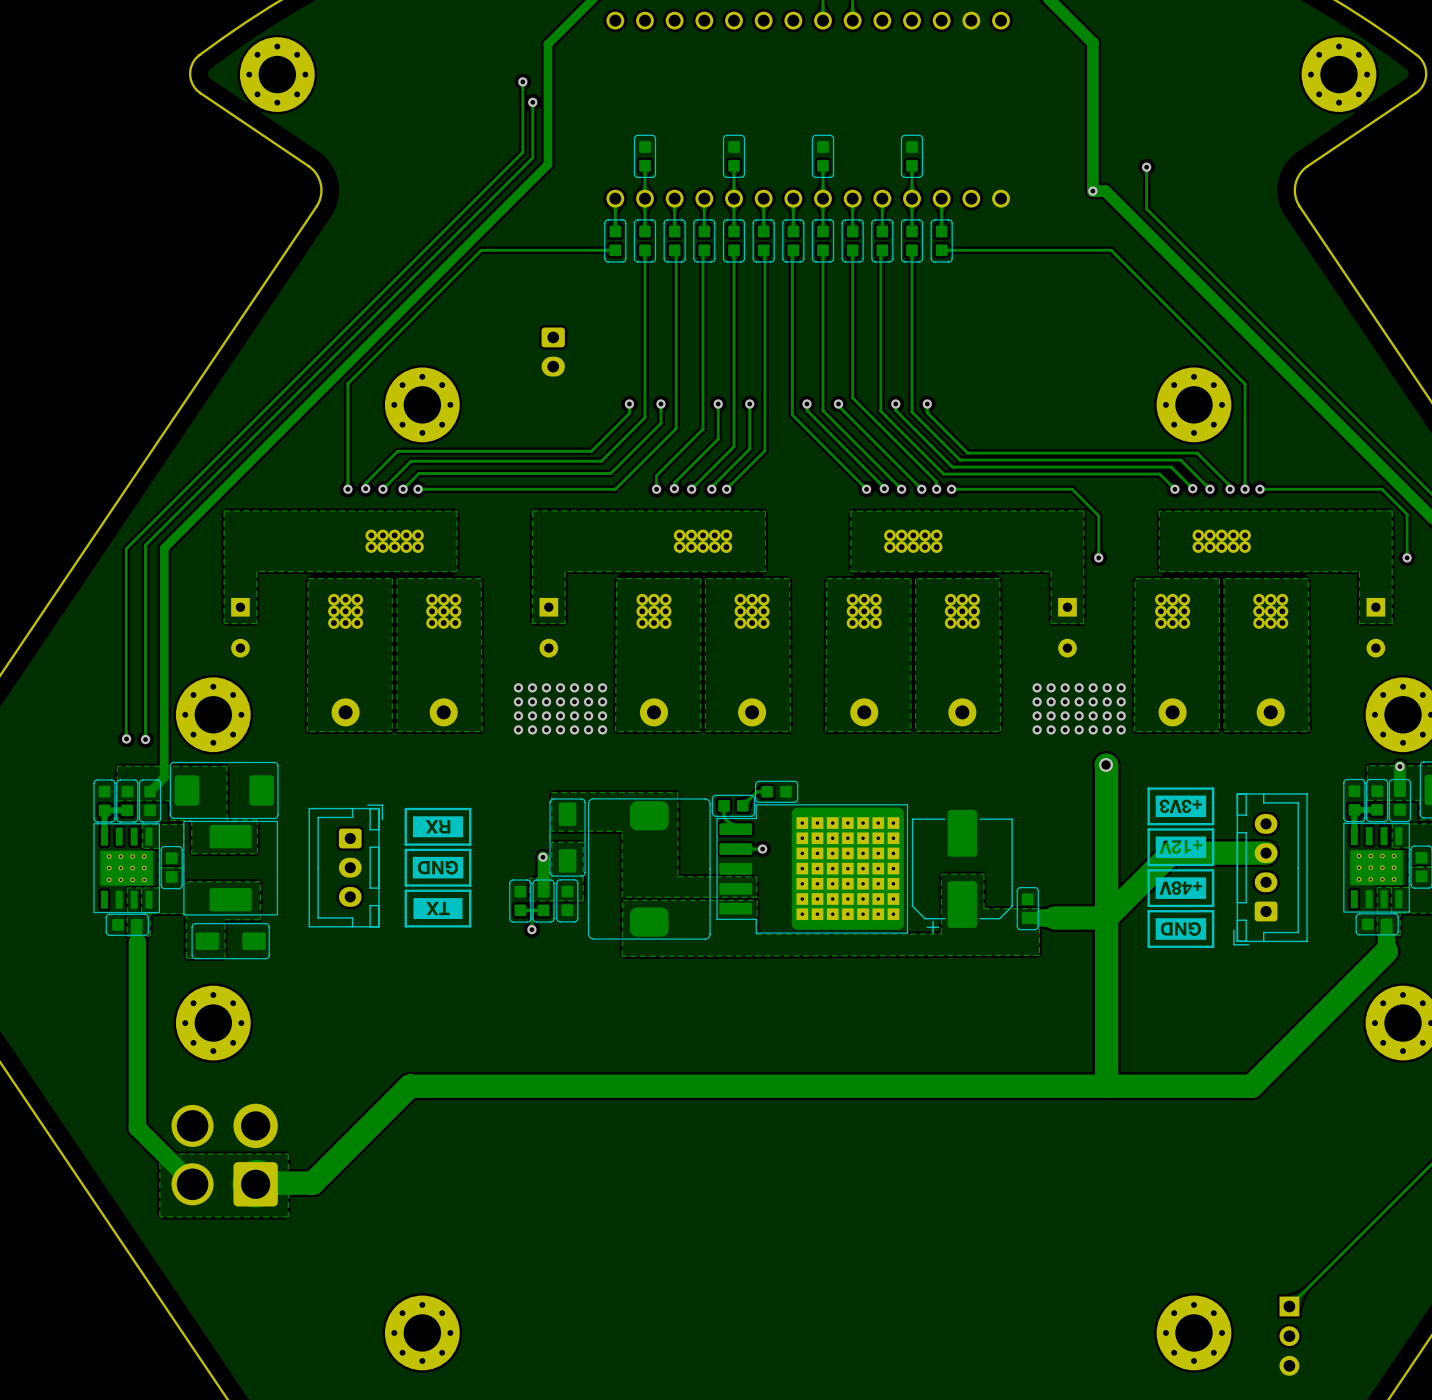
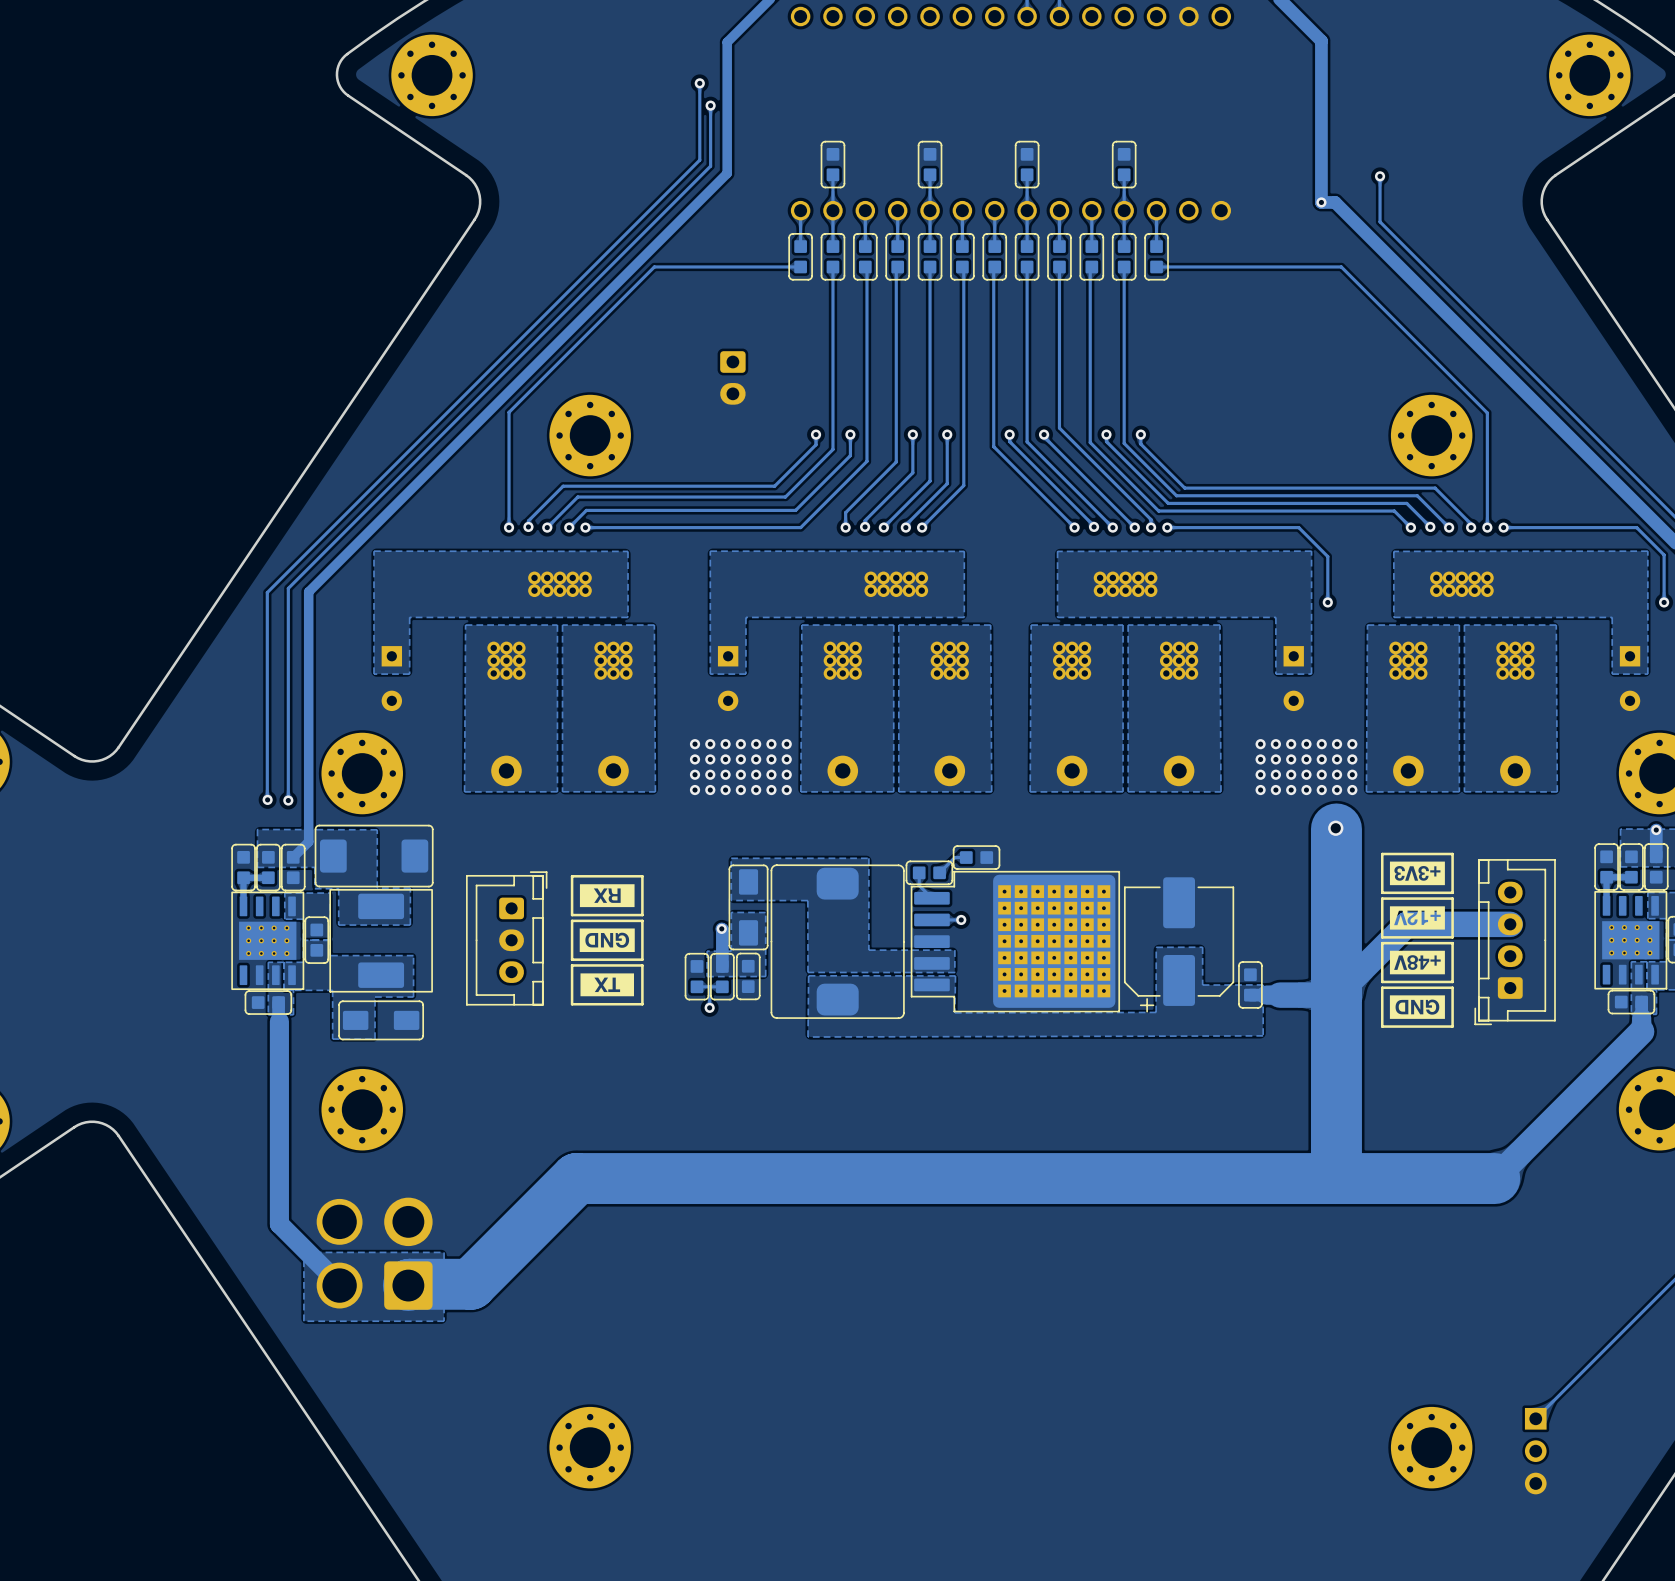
track width: thin (1106, 765) (1106, 1085) -> thick (1336, 828) (1336, 1177)
track width: thin (409, 1086) (312, 1183) (256, 1183) -> thick (576, 1178) (470, 1284) (409, 1284)
track width: thin (1251, 1086) (409, 1086) -> thick (1494, 1178) (576, 1178)

